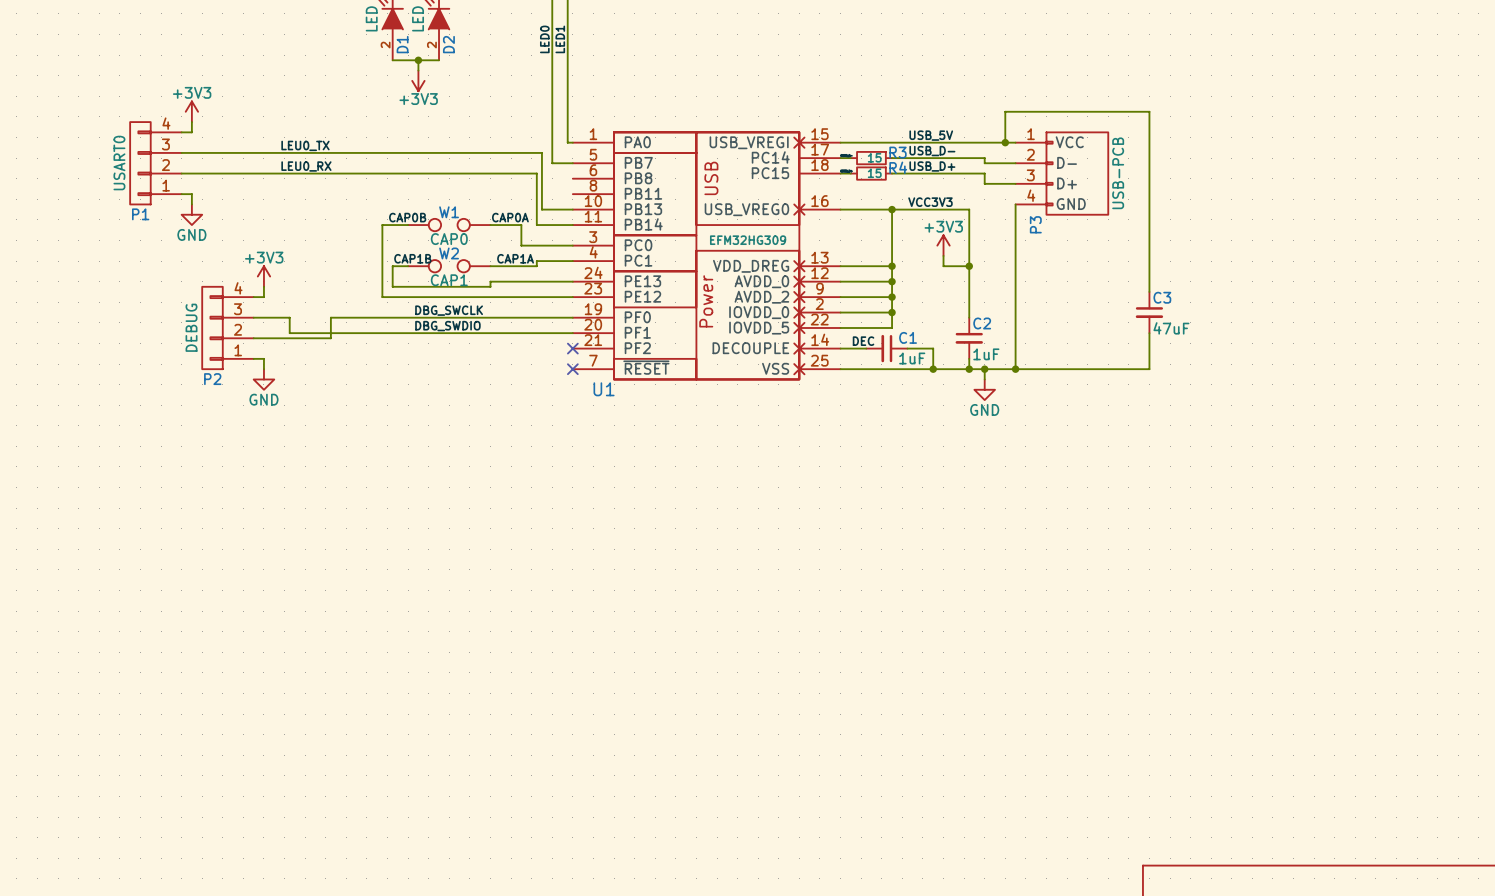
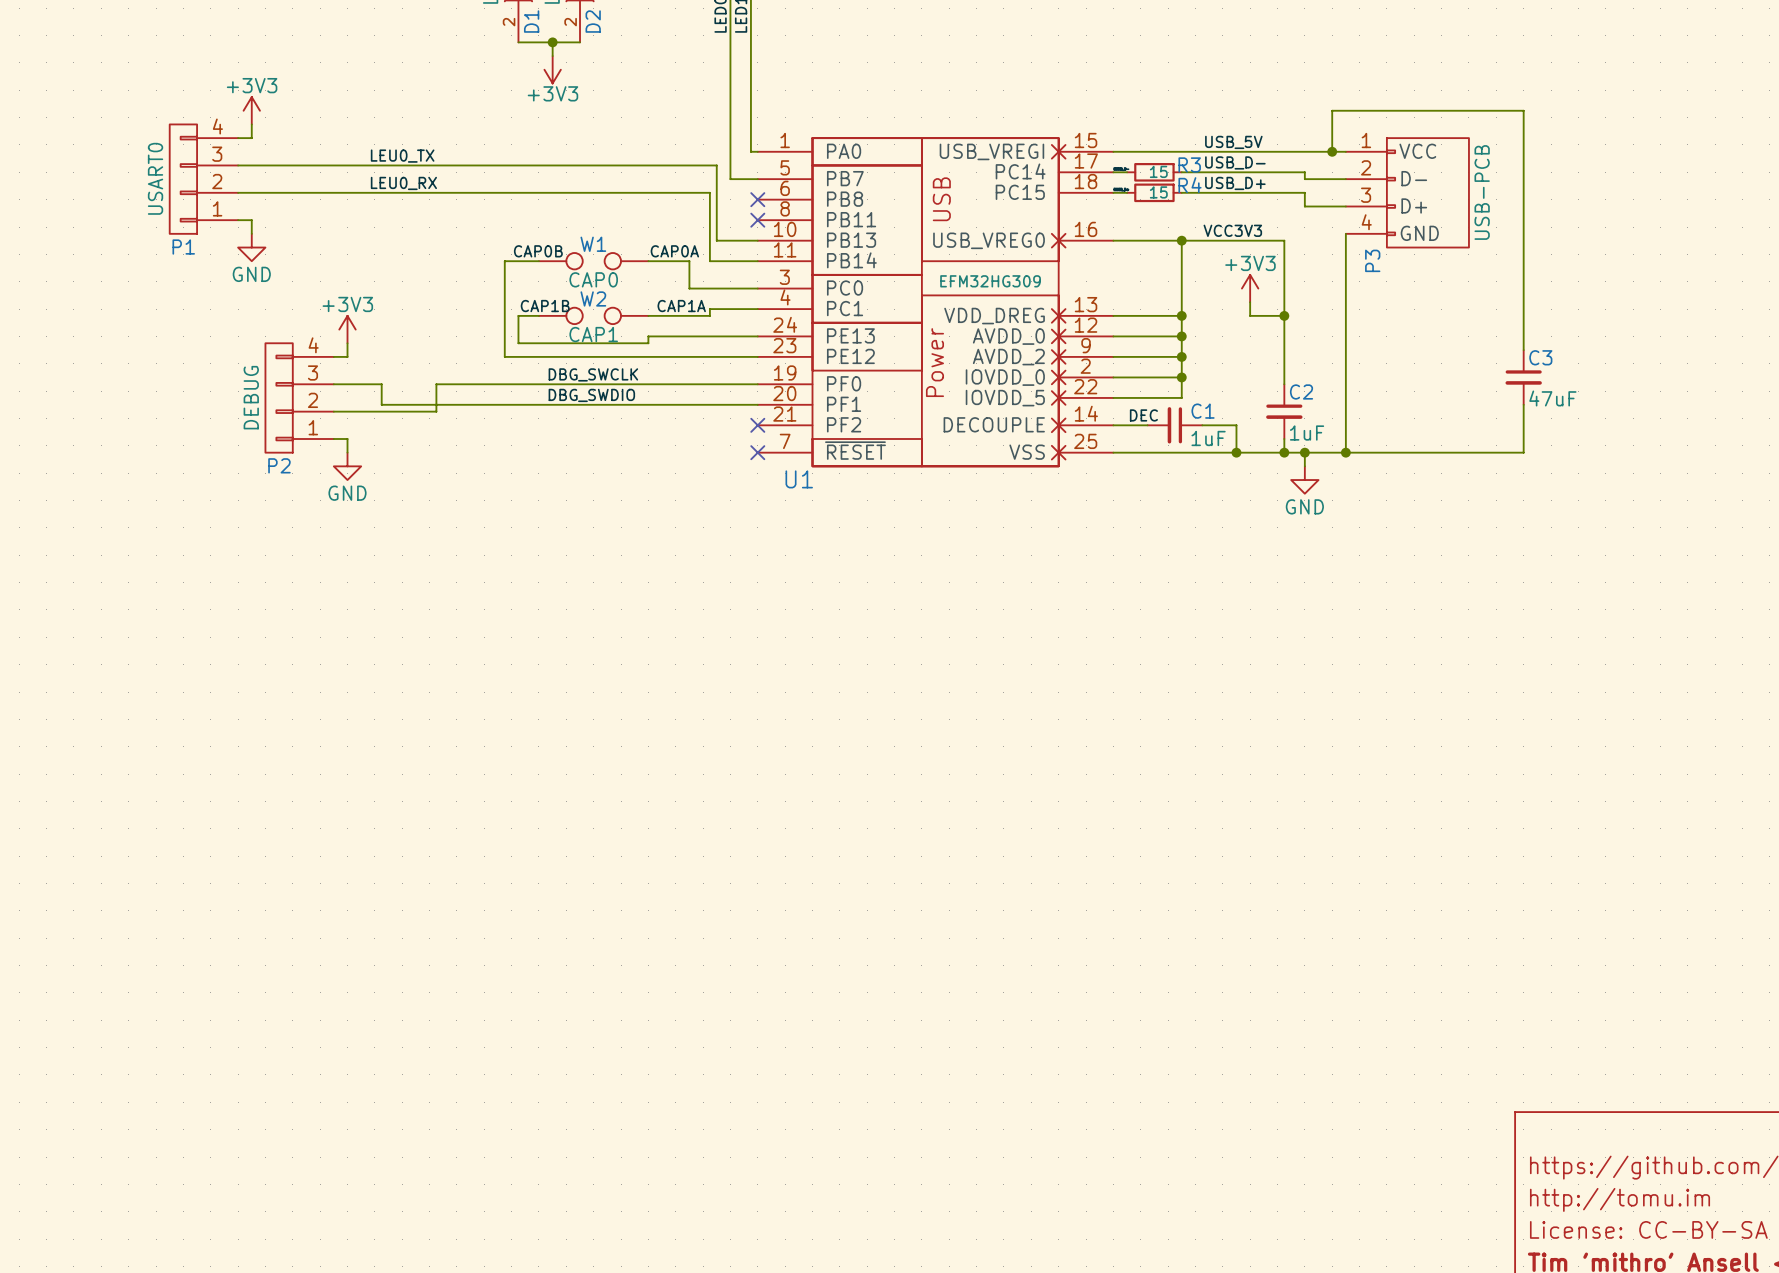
no-connect mark: none -> (757, 199)
no-connect mark: none -> (757, 220)

